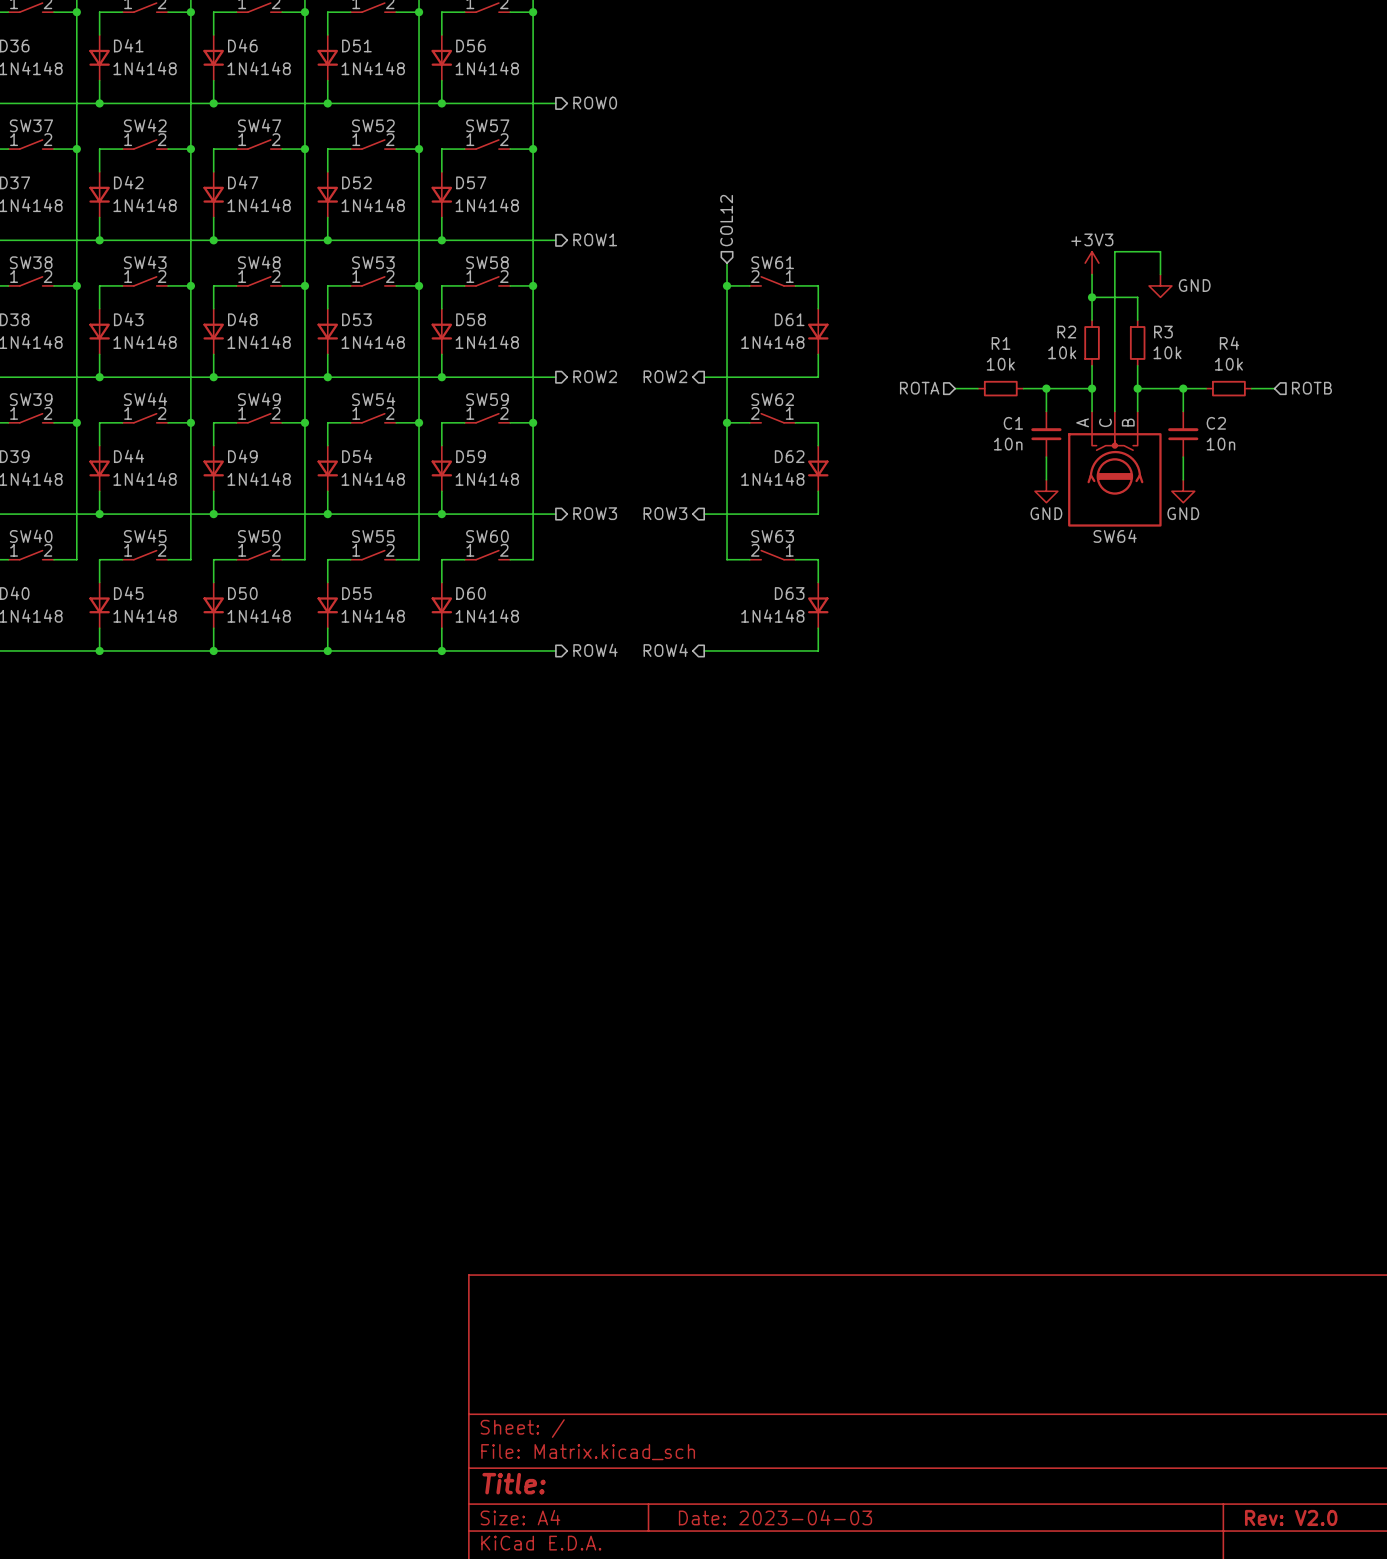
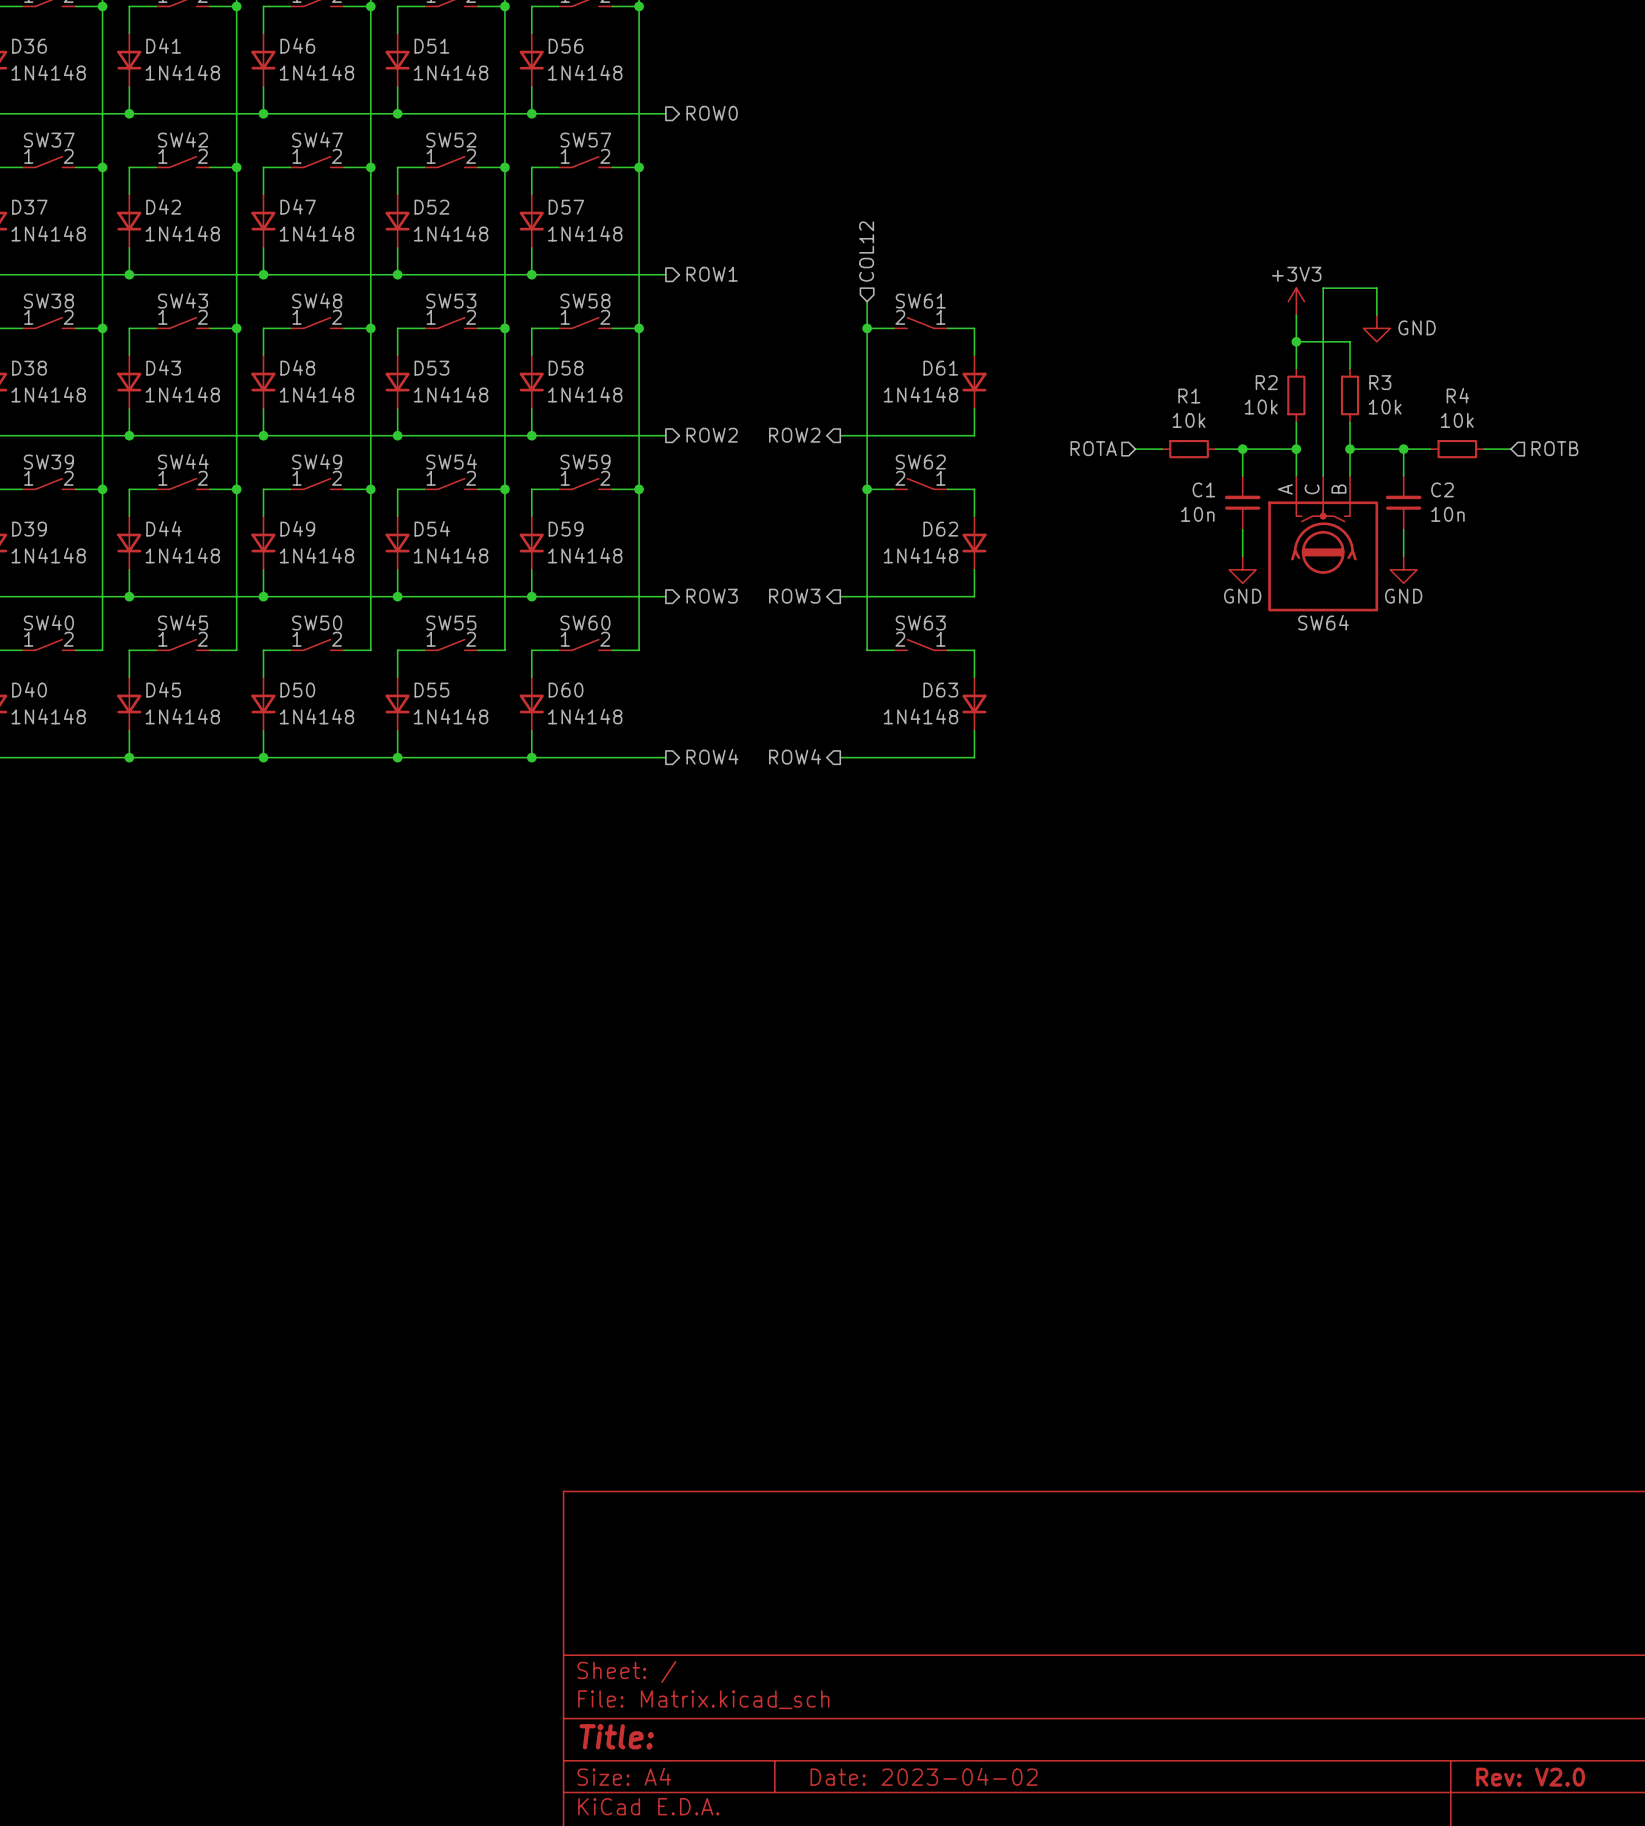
title block: Date: 2023-04-03 (775, 1517) -> Date: 2023-04-02 (924, 1776)

